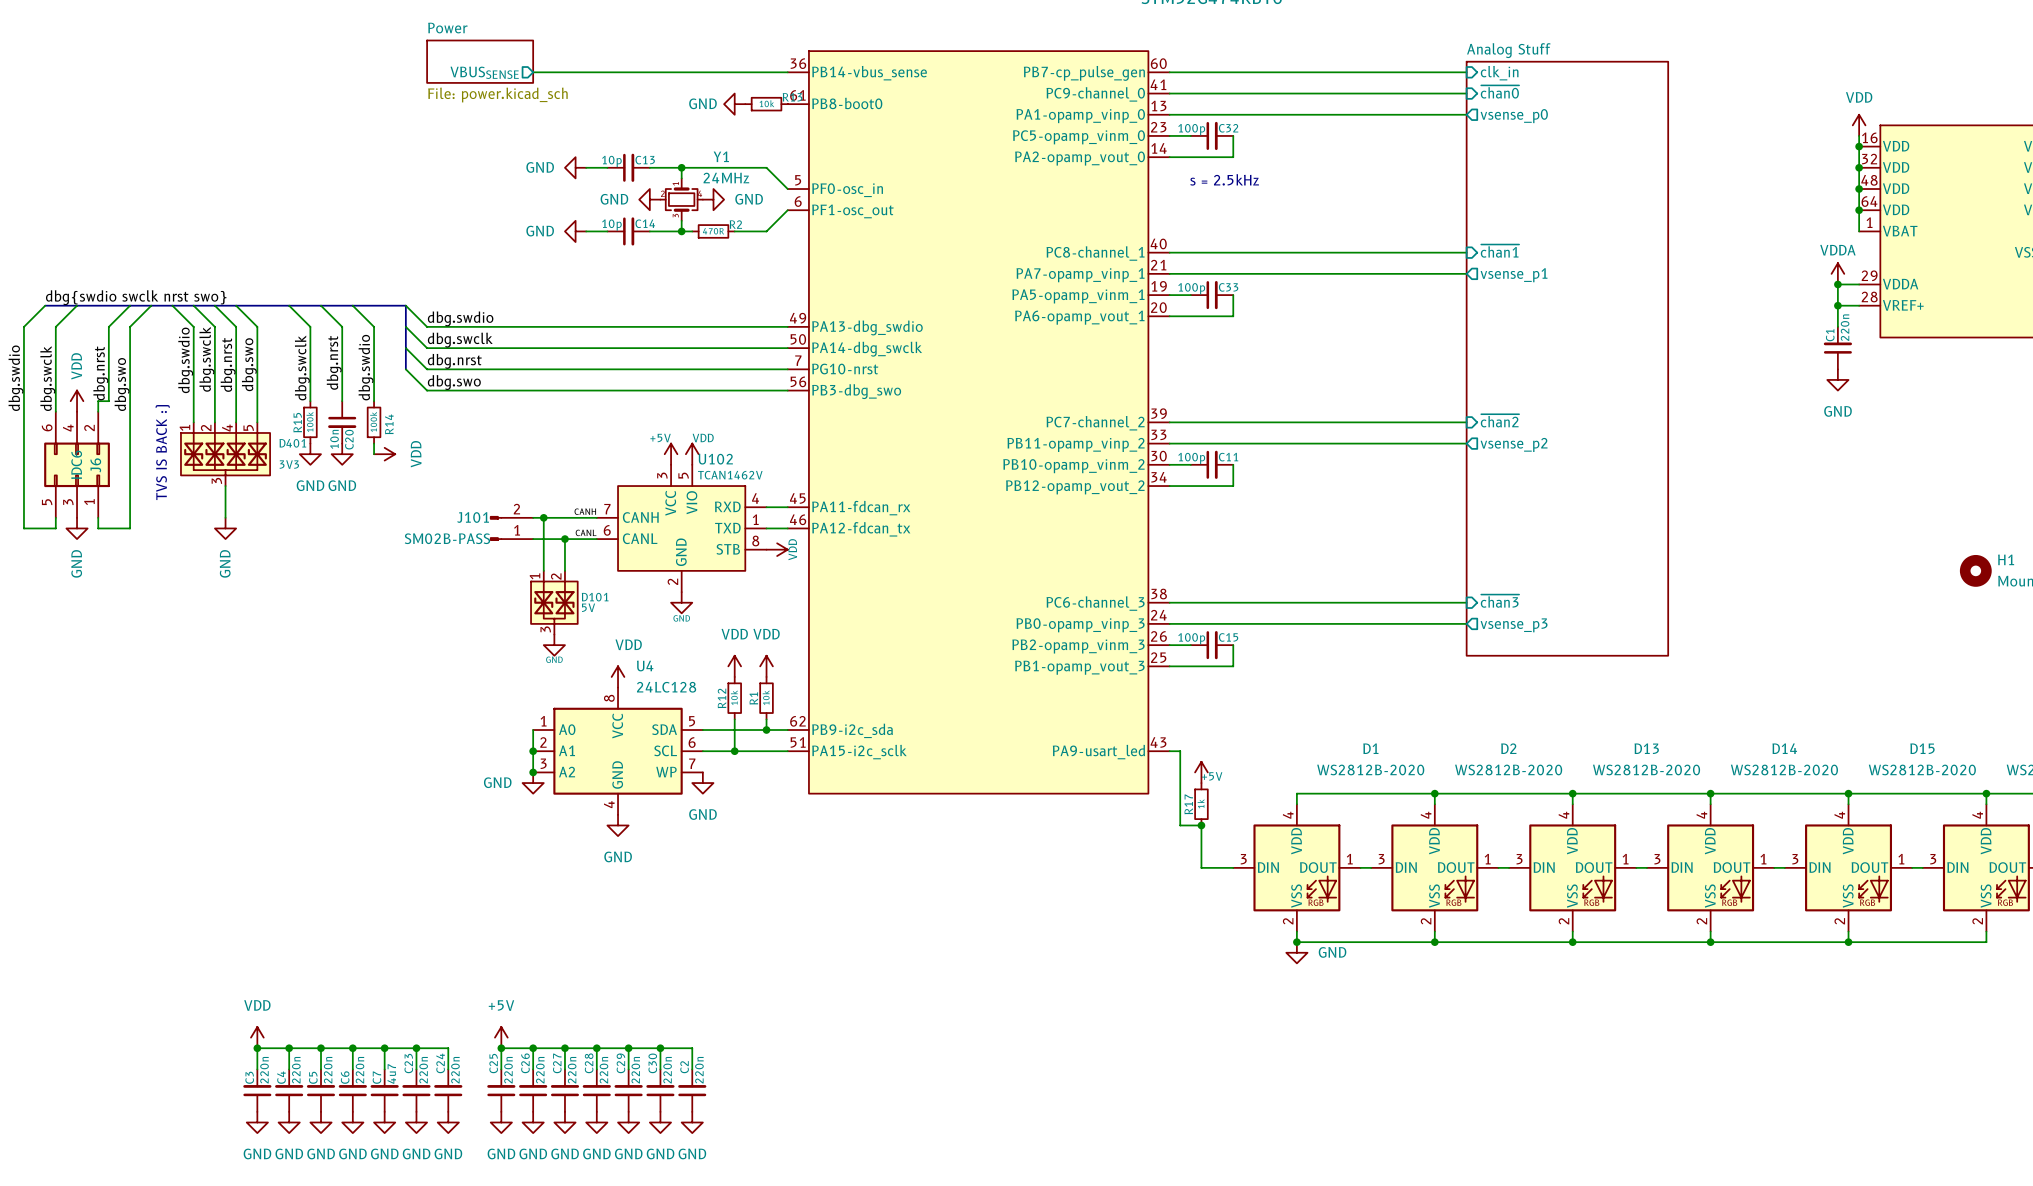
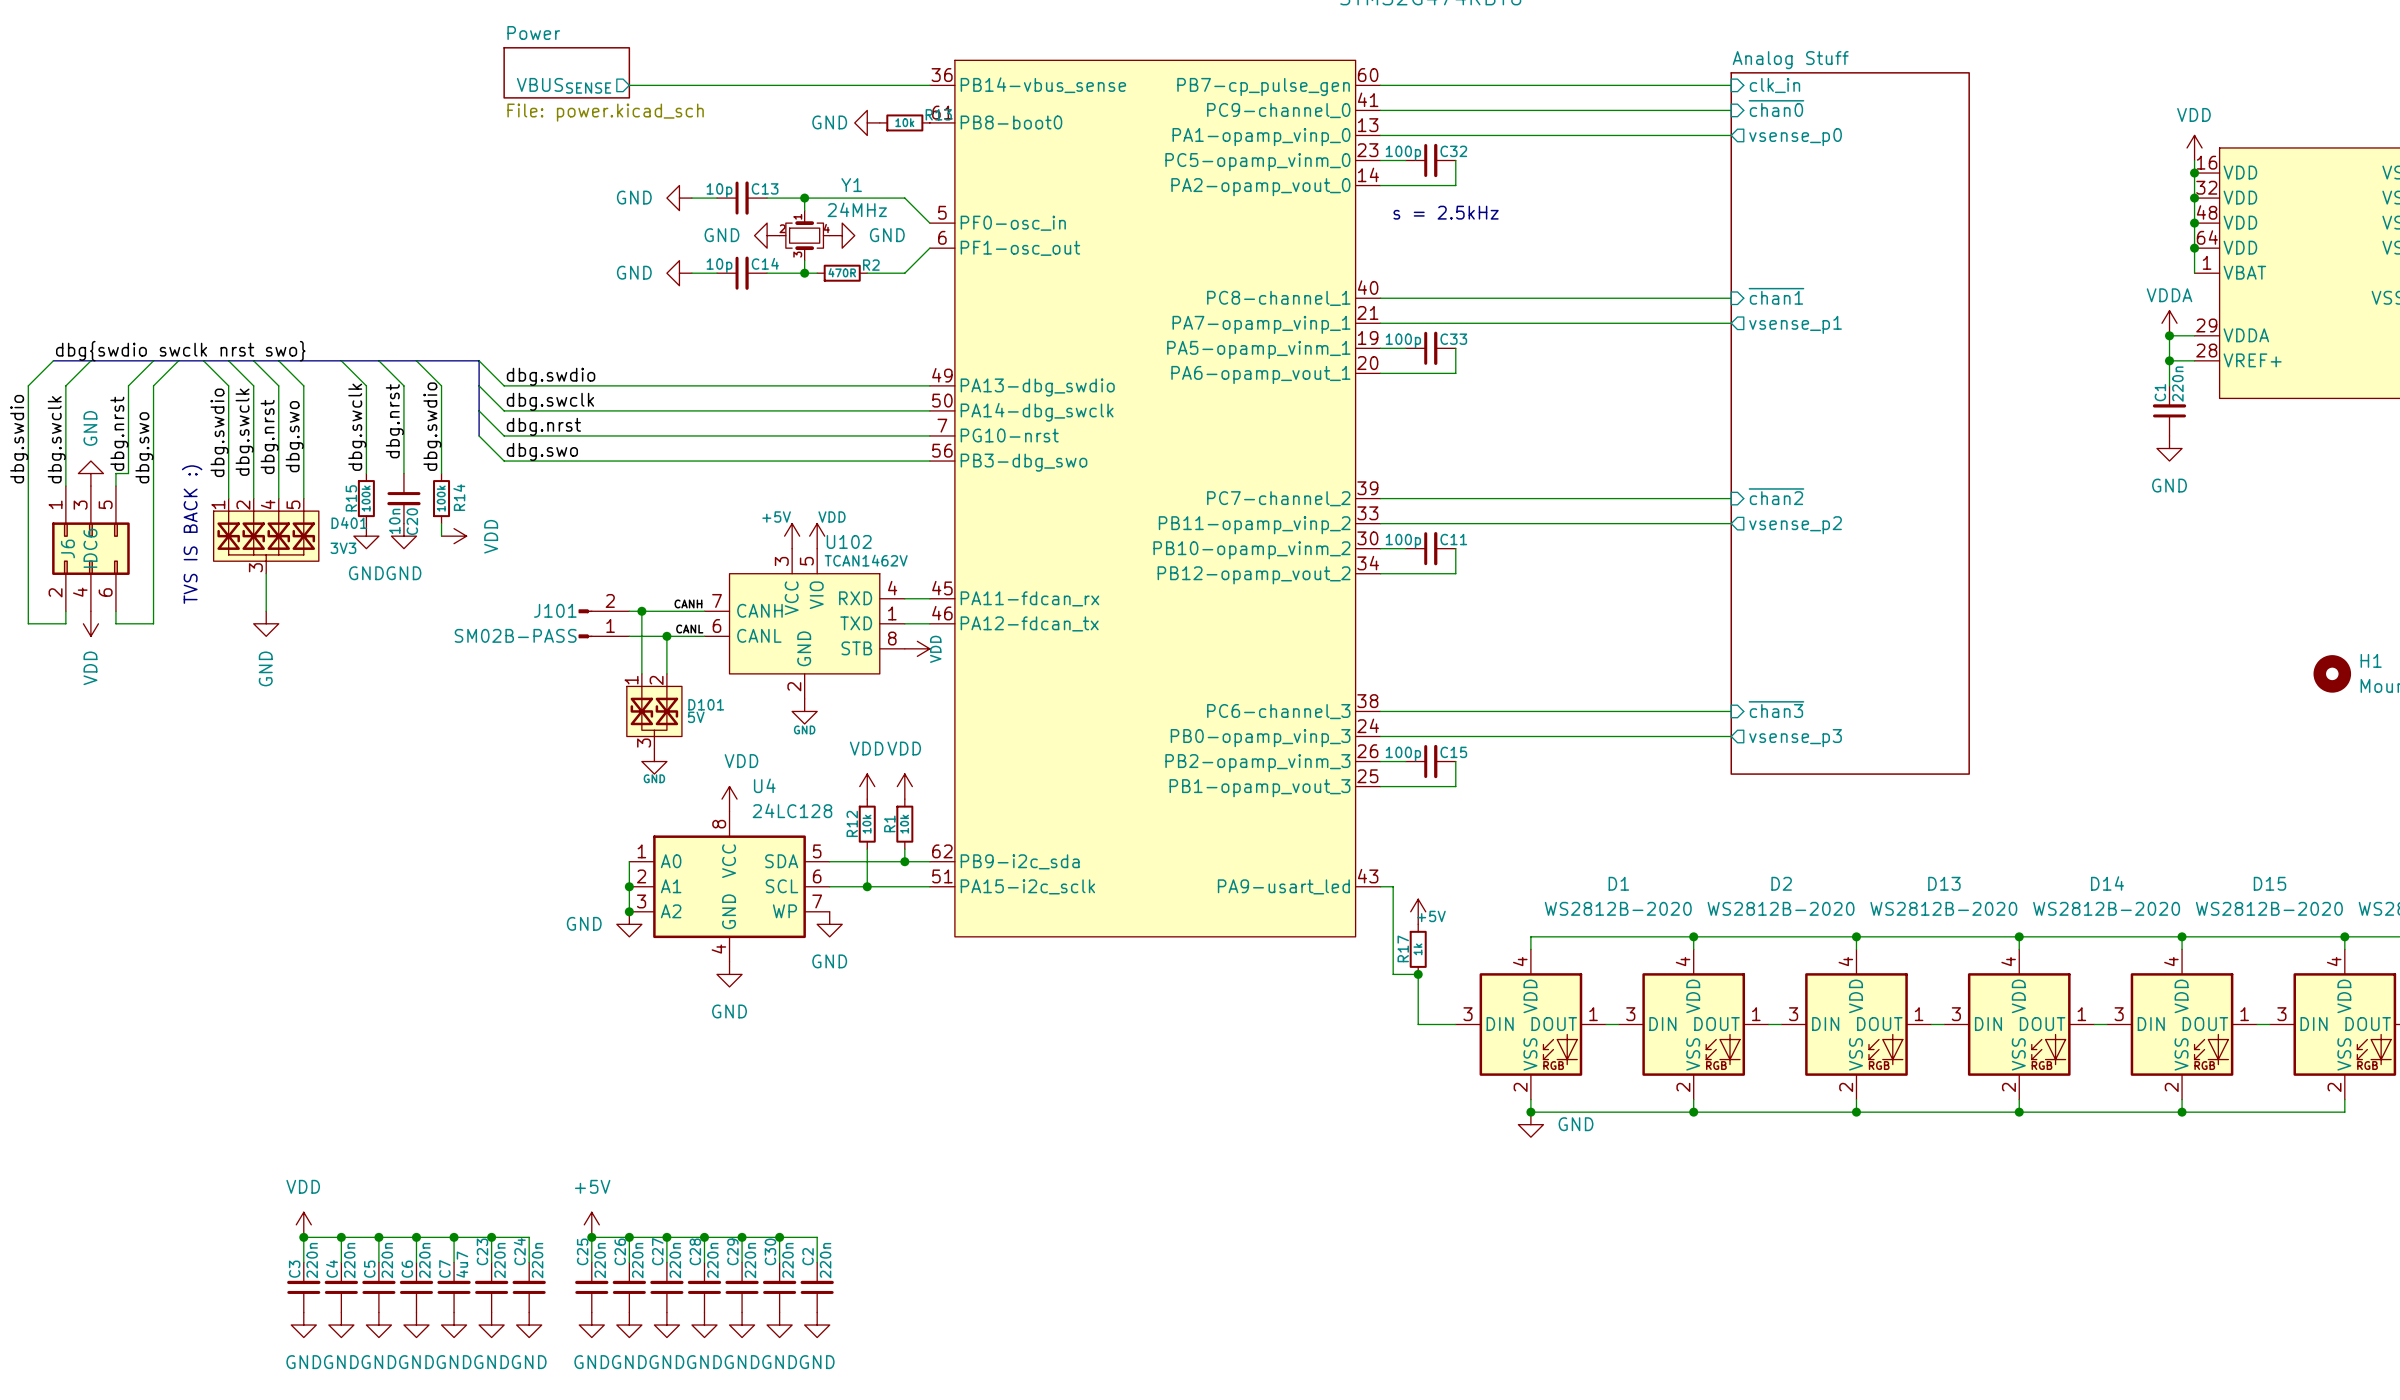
power symbol: VDD (77, 401) -> GND (90, 473)
J6 rotation: 0° (77, 464) -> 180° (90, 548)
power symbol: GND (77, 528) -> VDD (90, 623)

